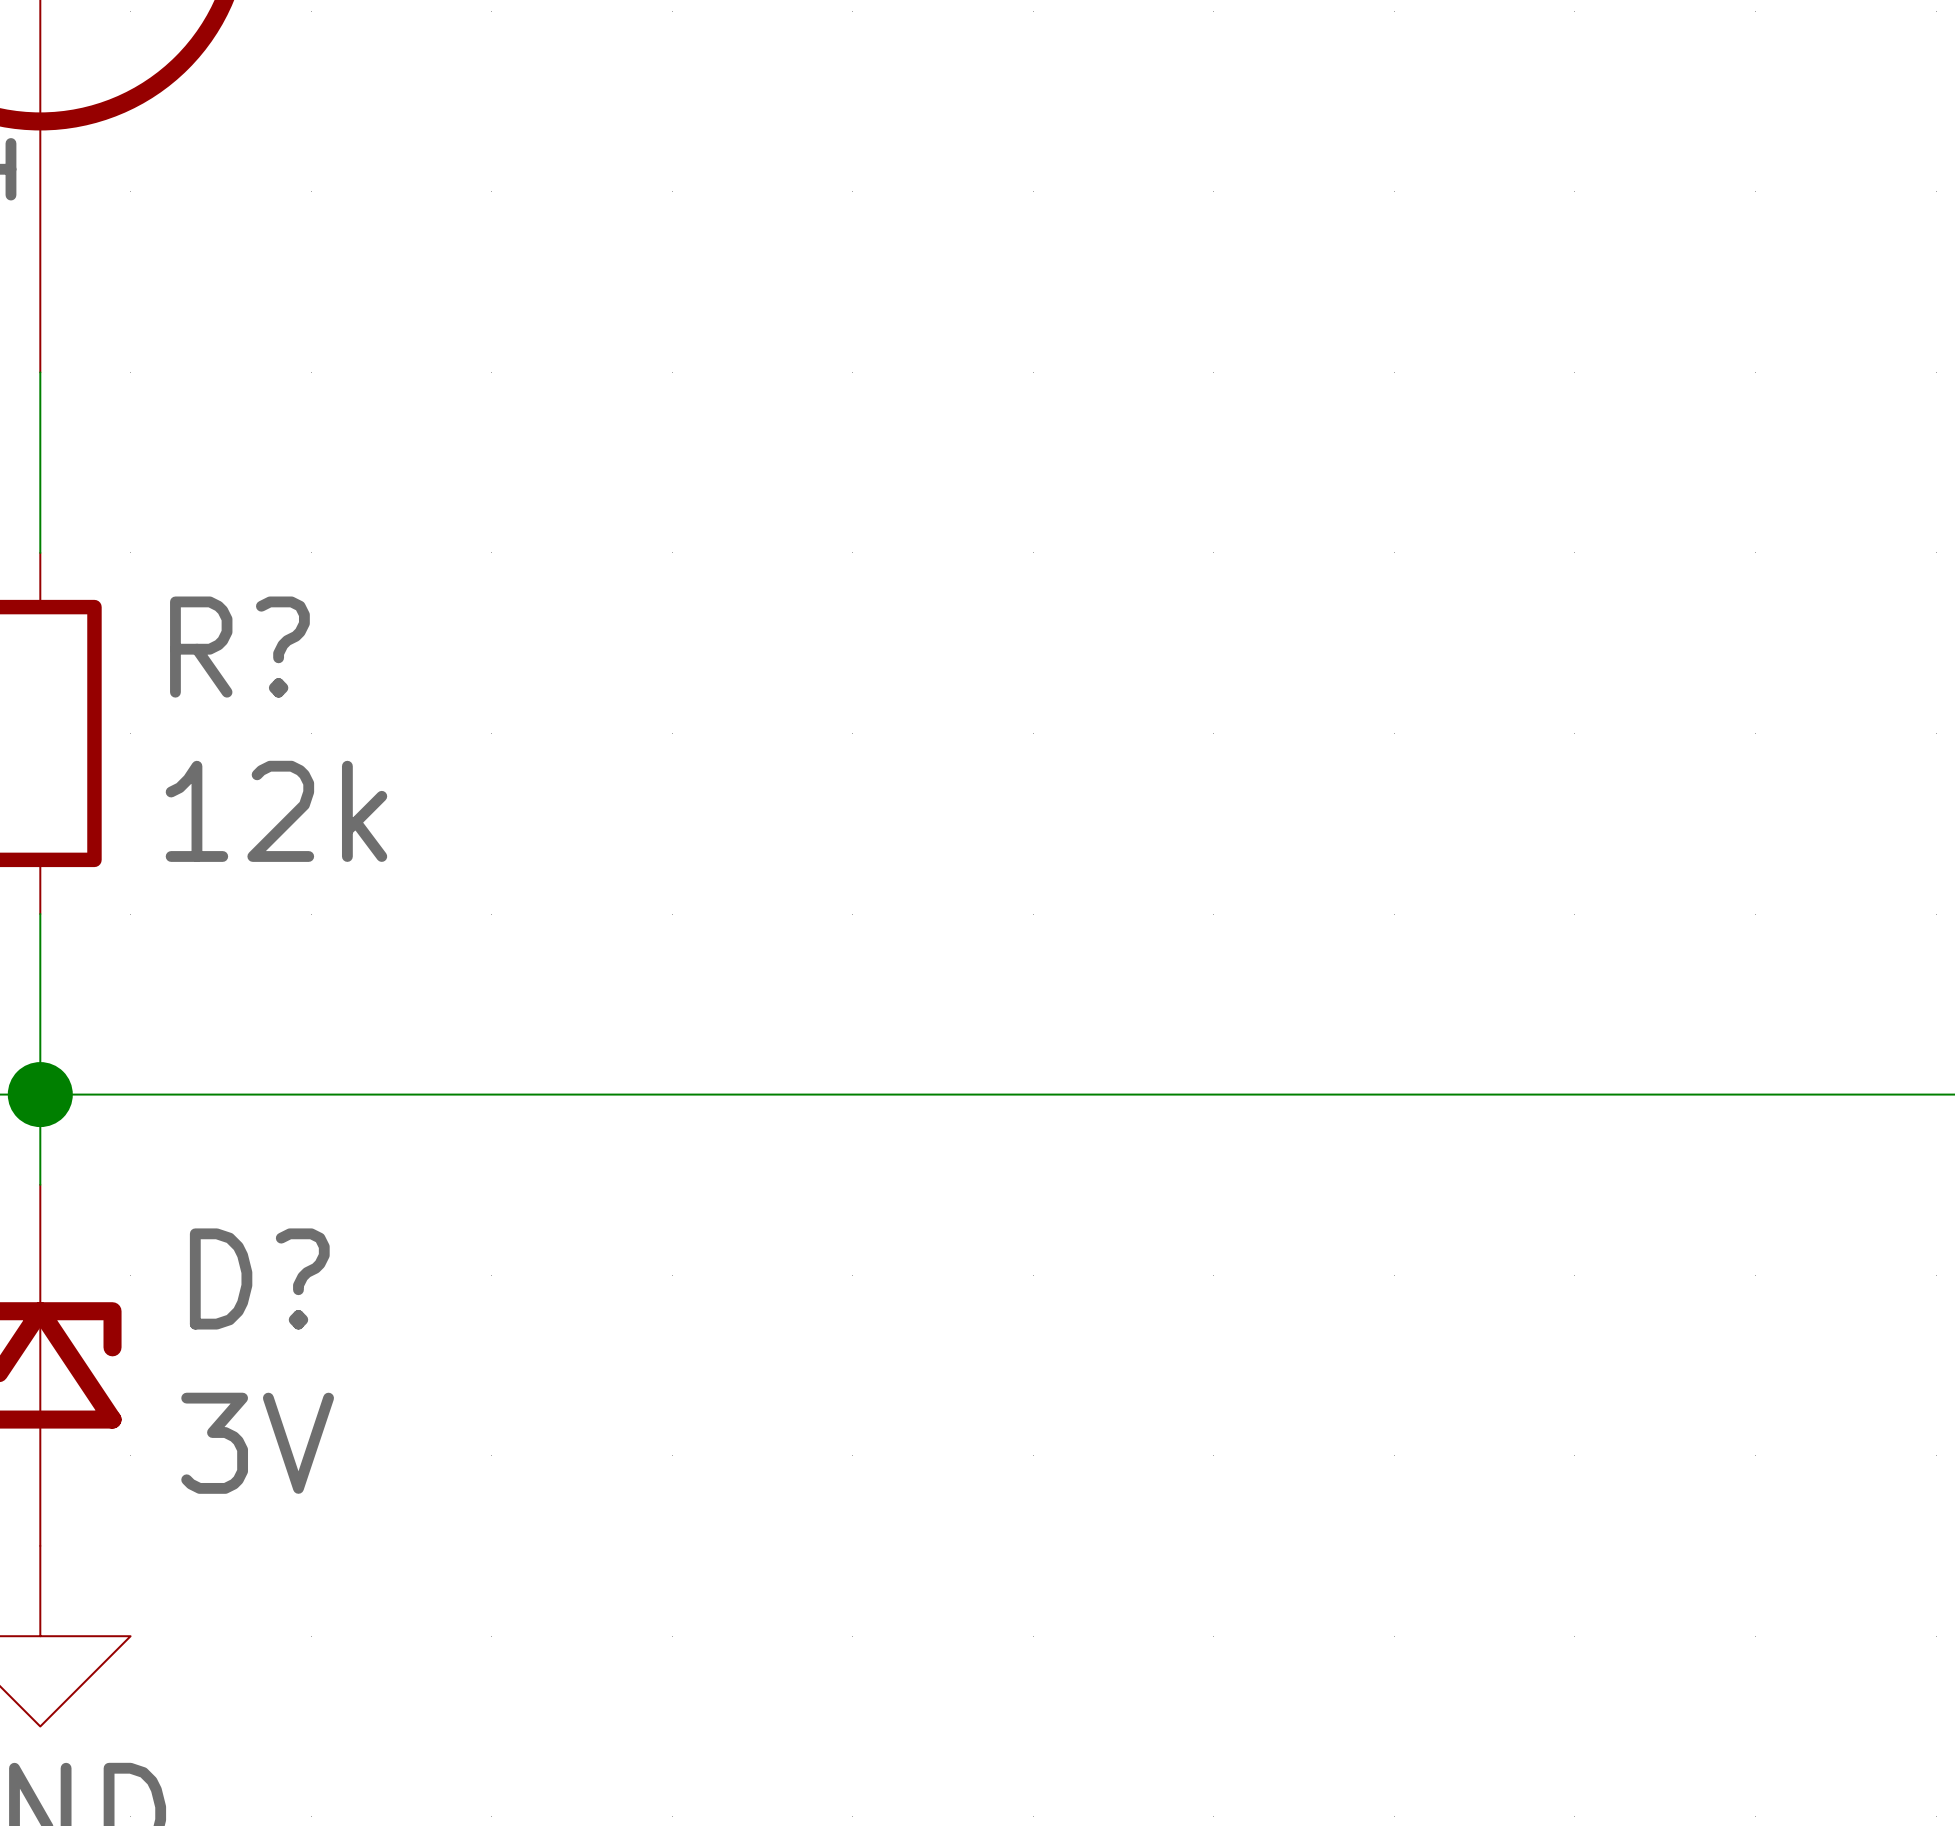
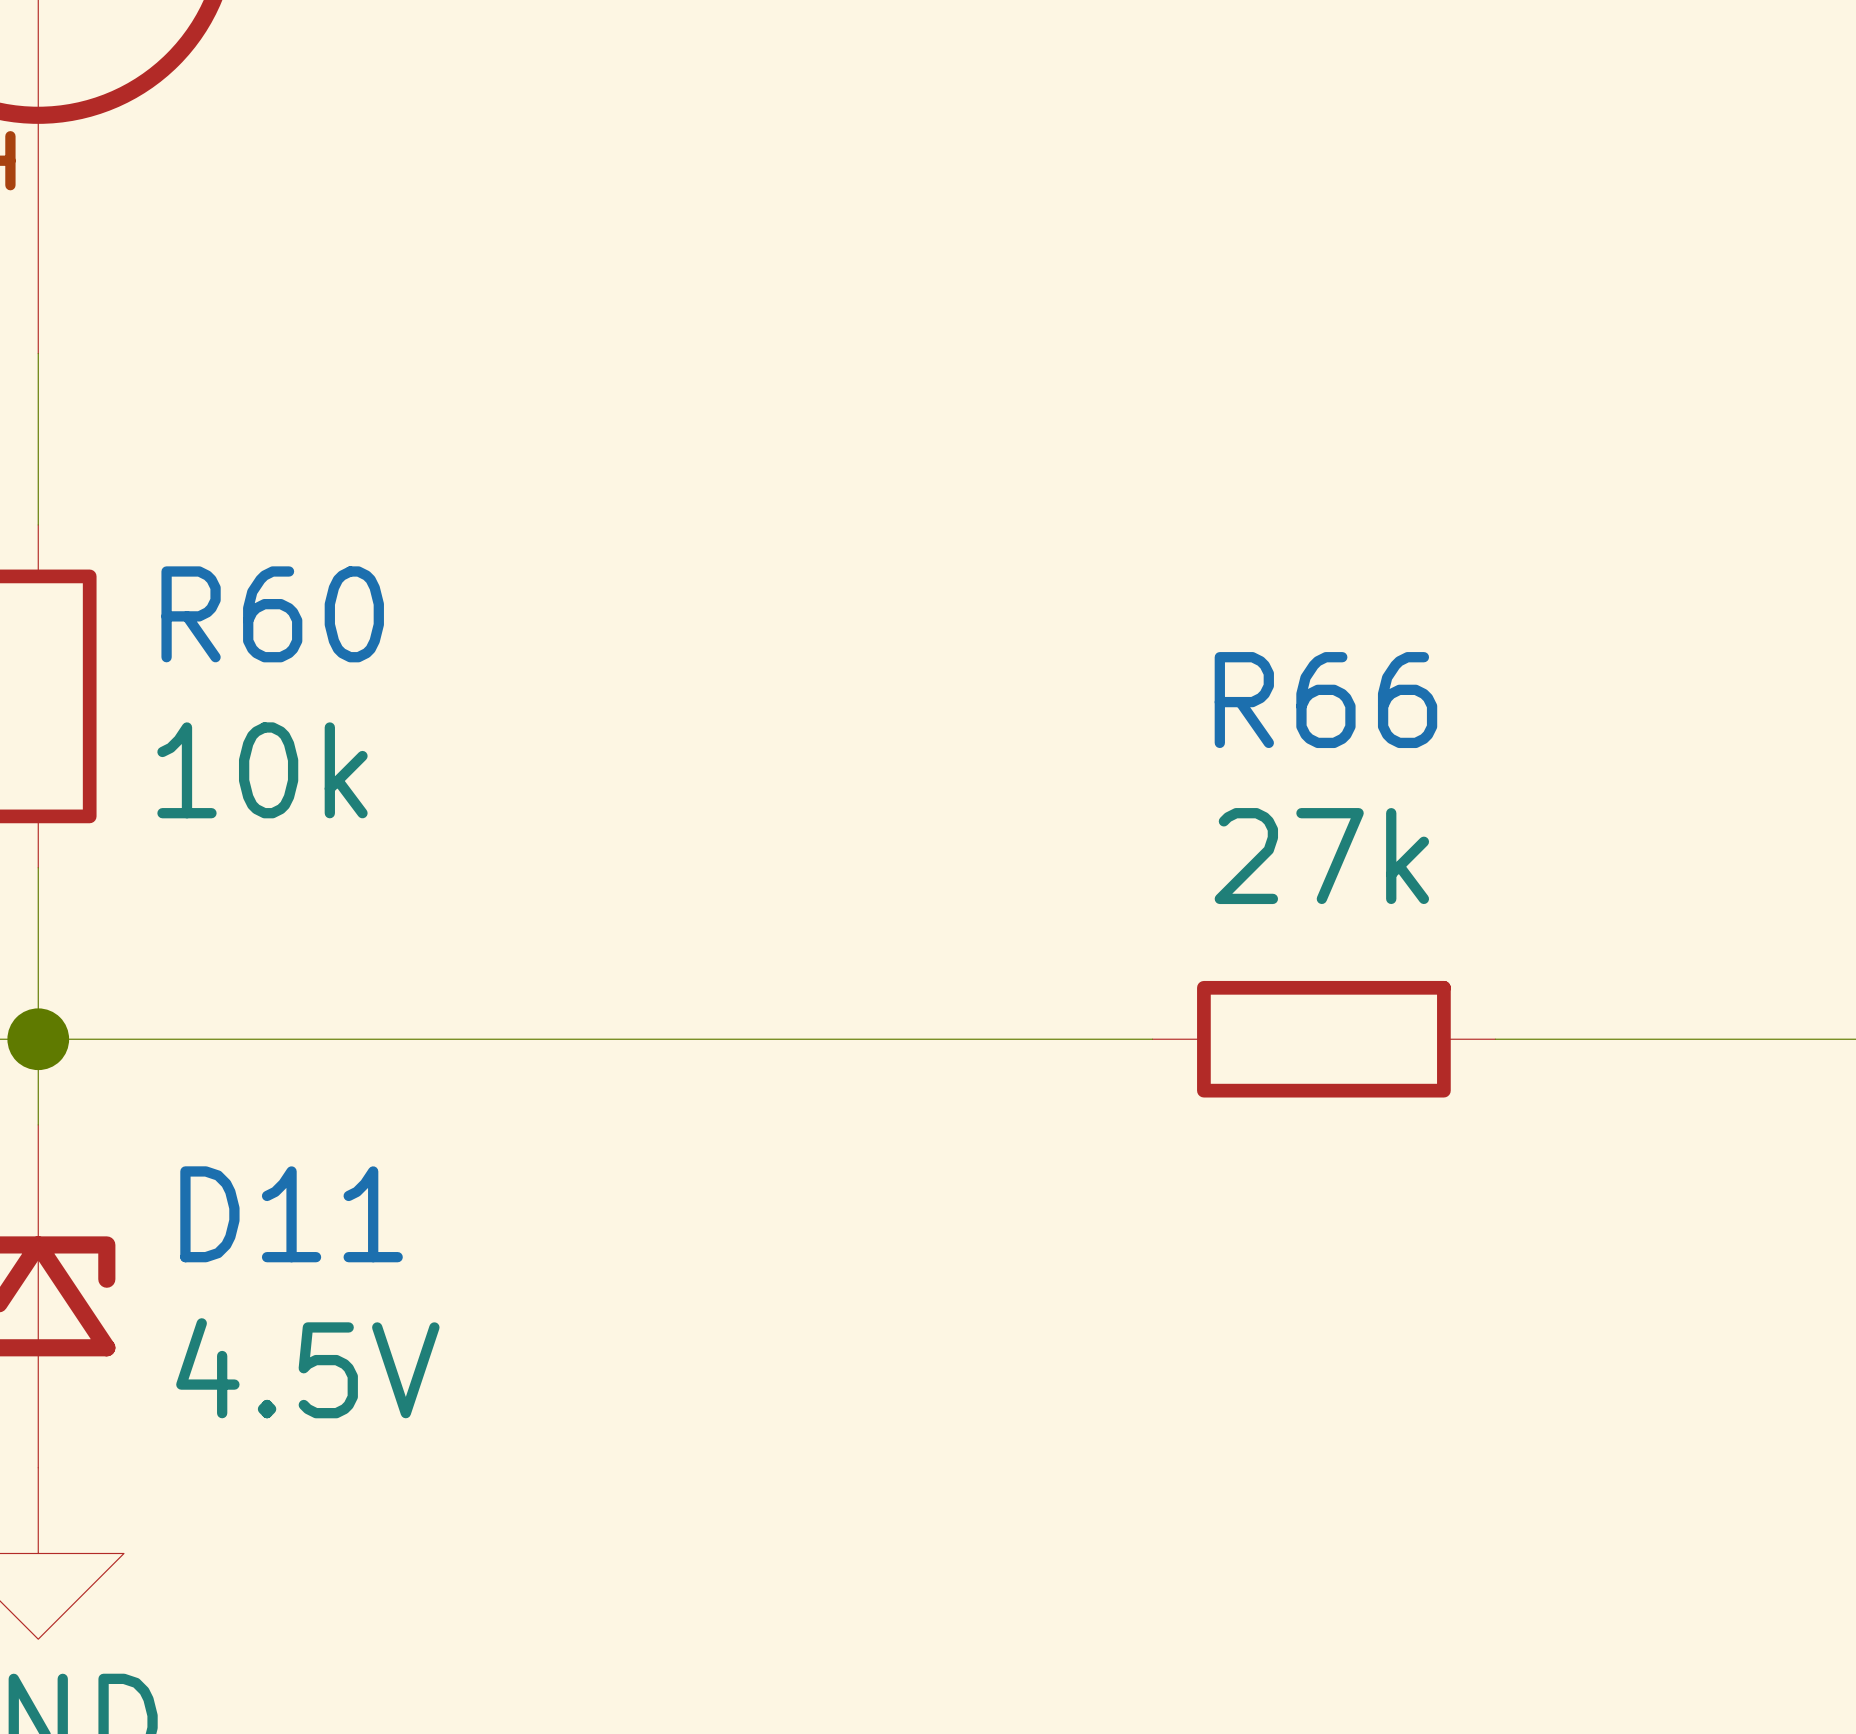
R? name: R? (239, 647) -> R60 (272, 614)
R? value: 12k (276, 811) -> 10k (262, 770)
wire: (1213, 1094) (1574, 1094) -> none
R66: none -> 27k (1323, 1039)
D? name: D? (259, 1278) -> D11 (291, 1214)
D? value: 3V (257, 1443) -> 4.5V (307, 1368)

